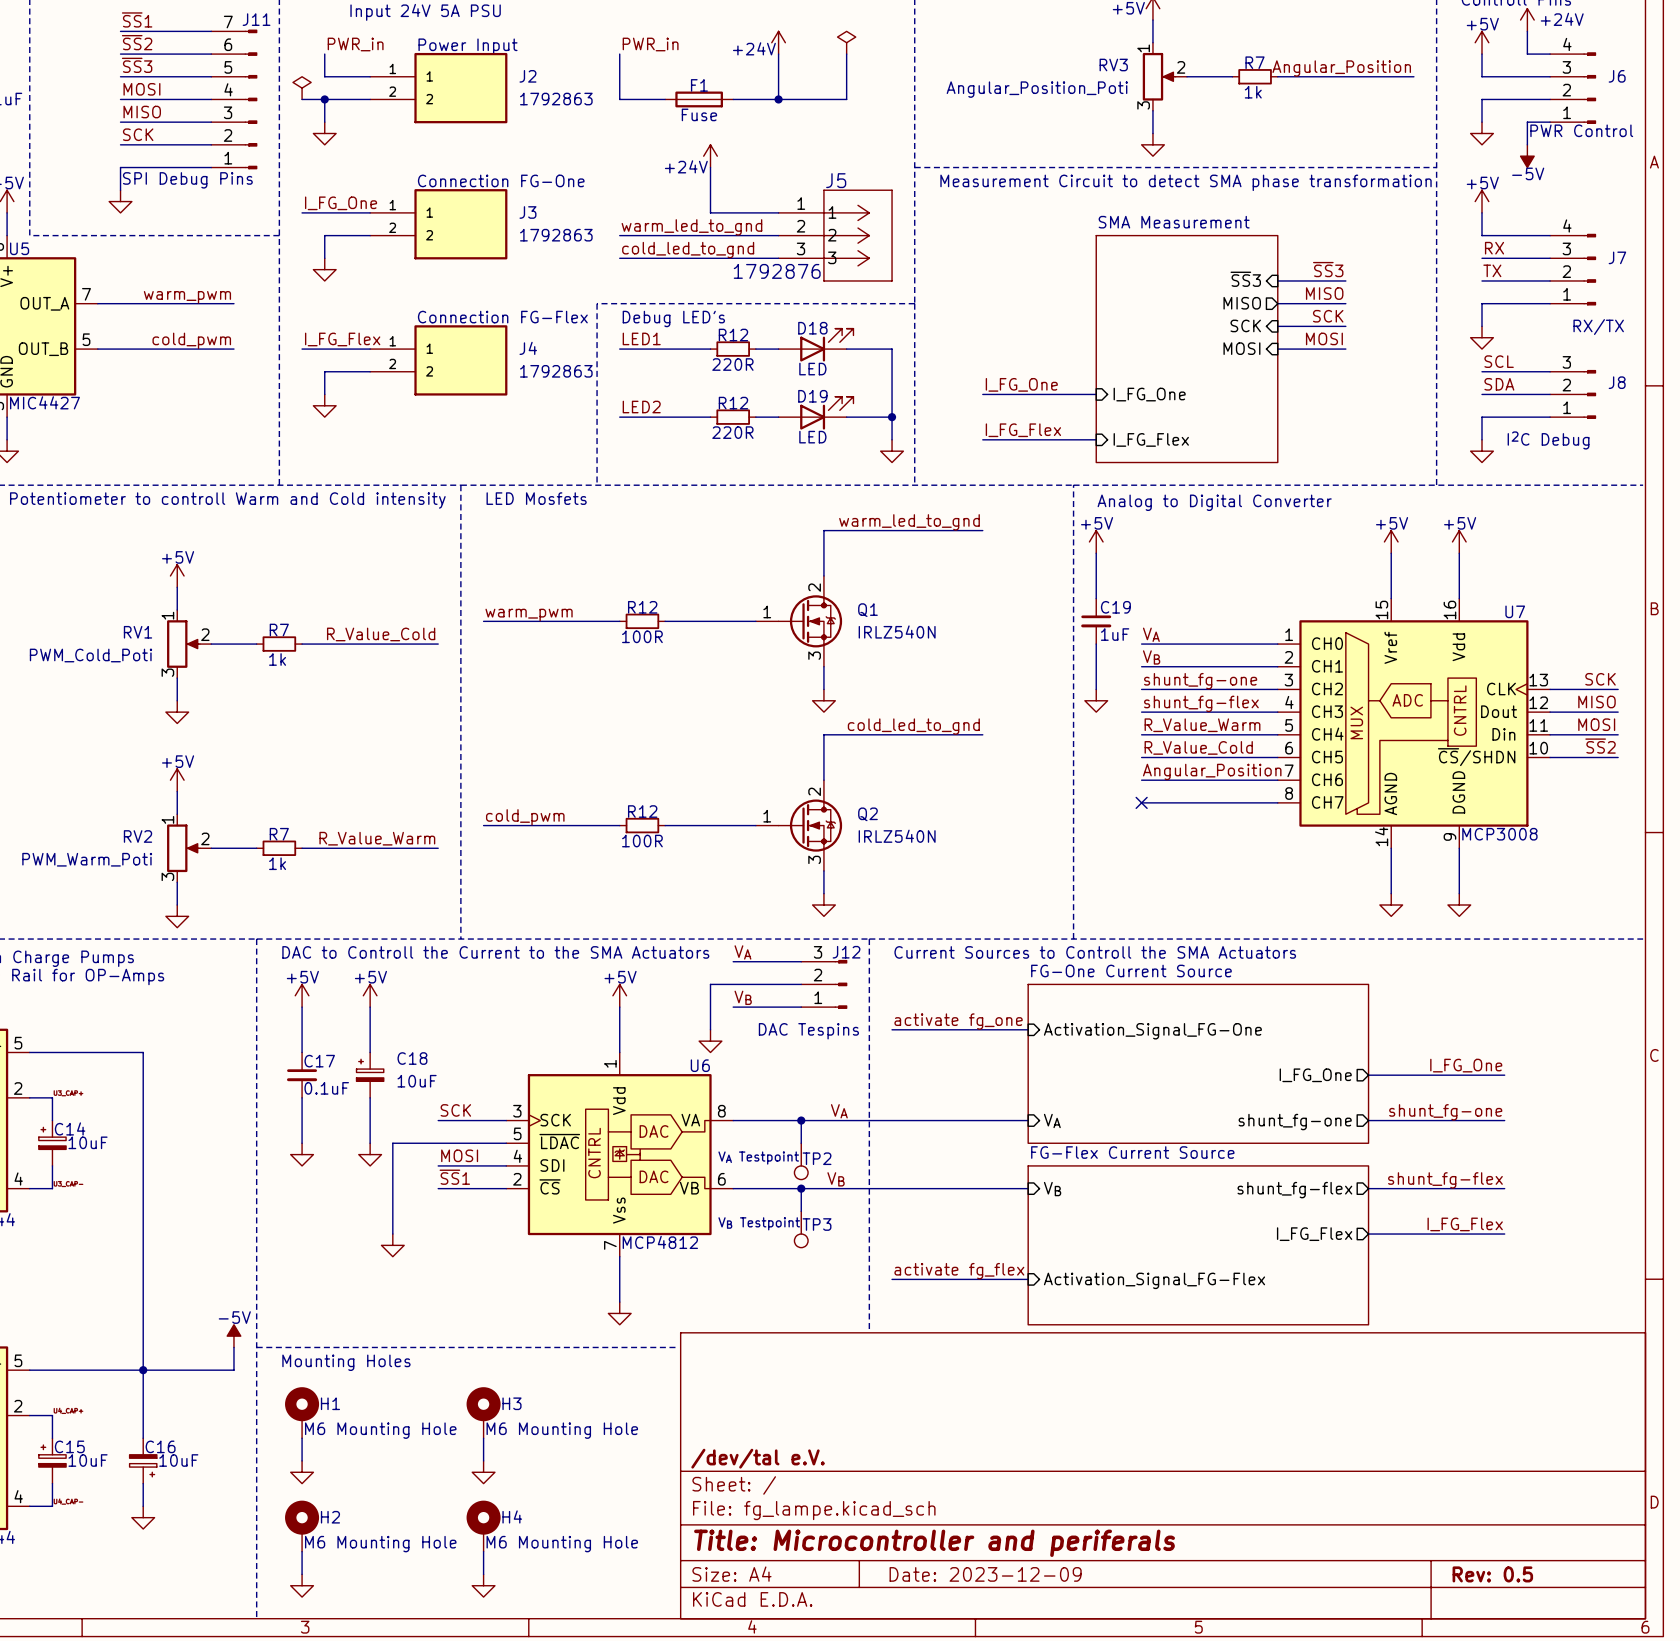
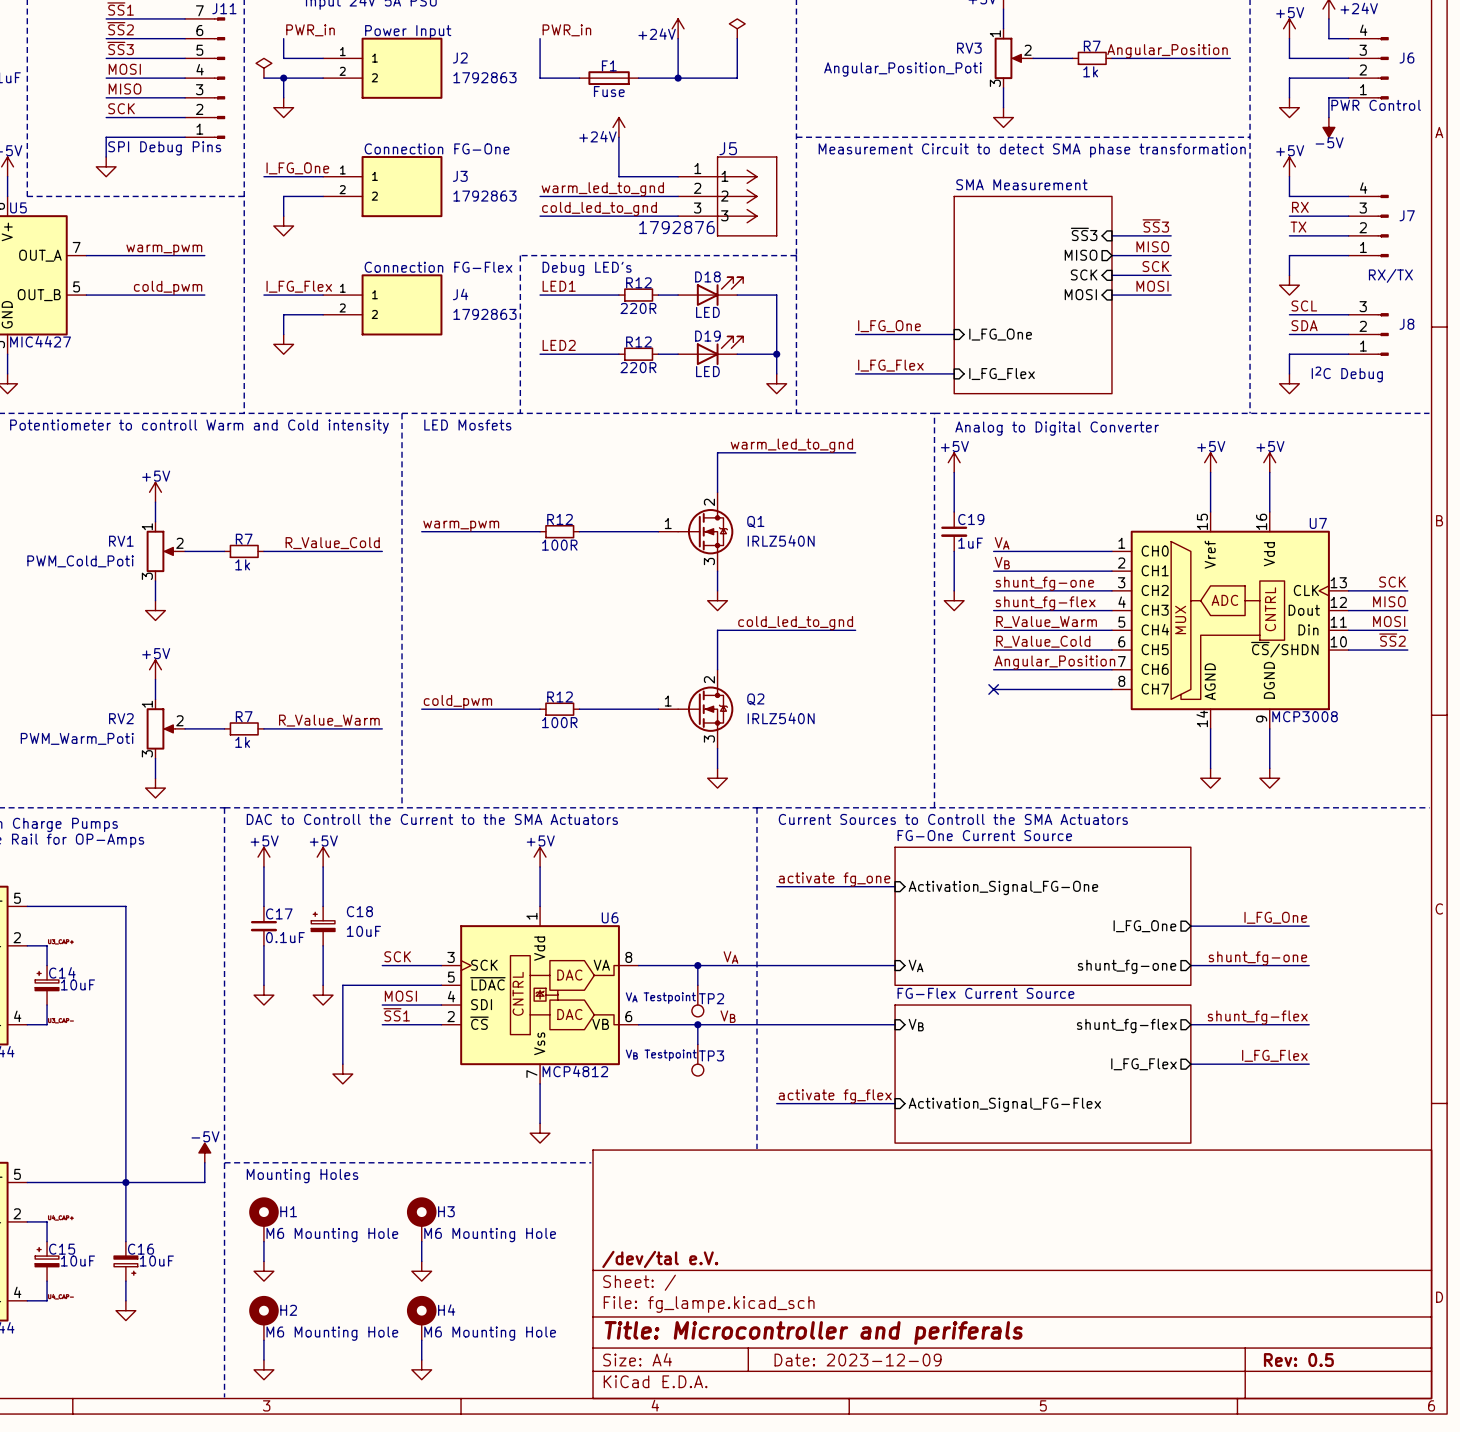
label: VA (742, 952) -> none
wire: (733, 961) (801, 961) -> none
wire: (801, 984) (710, 984) (710, 1029) -> none
J12: DAC Tespins (824, 984) -> none
label: VB (743, 997) -> none
wire: (733, 1007) (801, 1007) -> none
power symbol: (710, 1041) -> none

